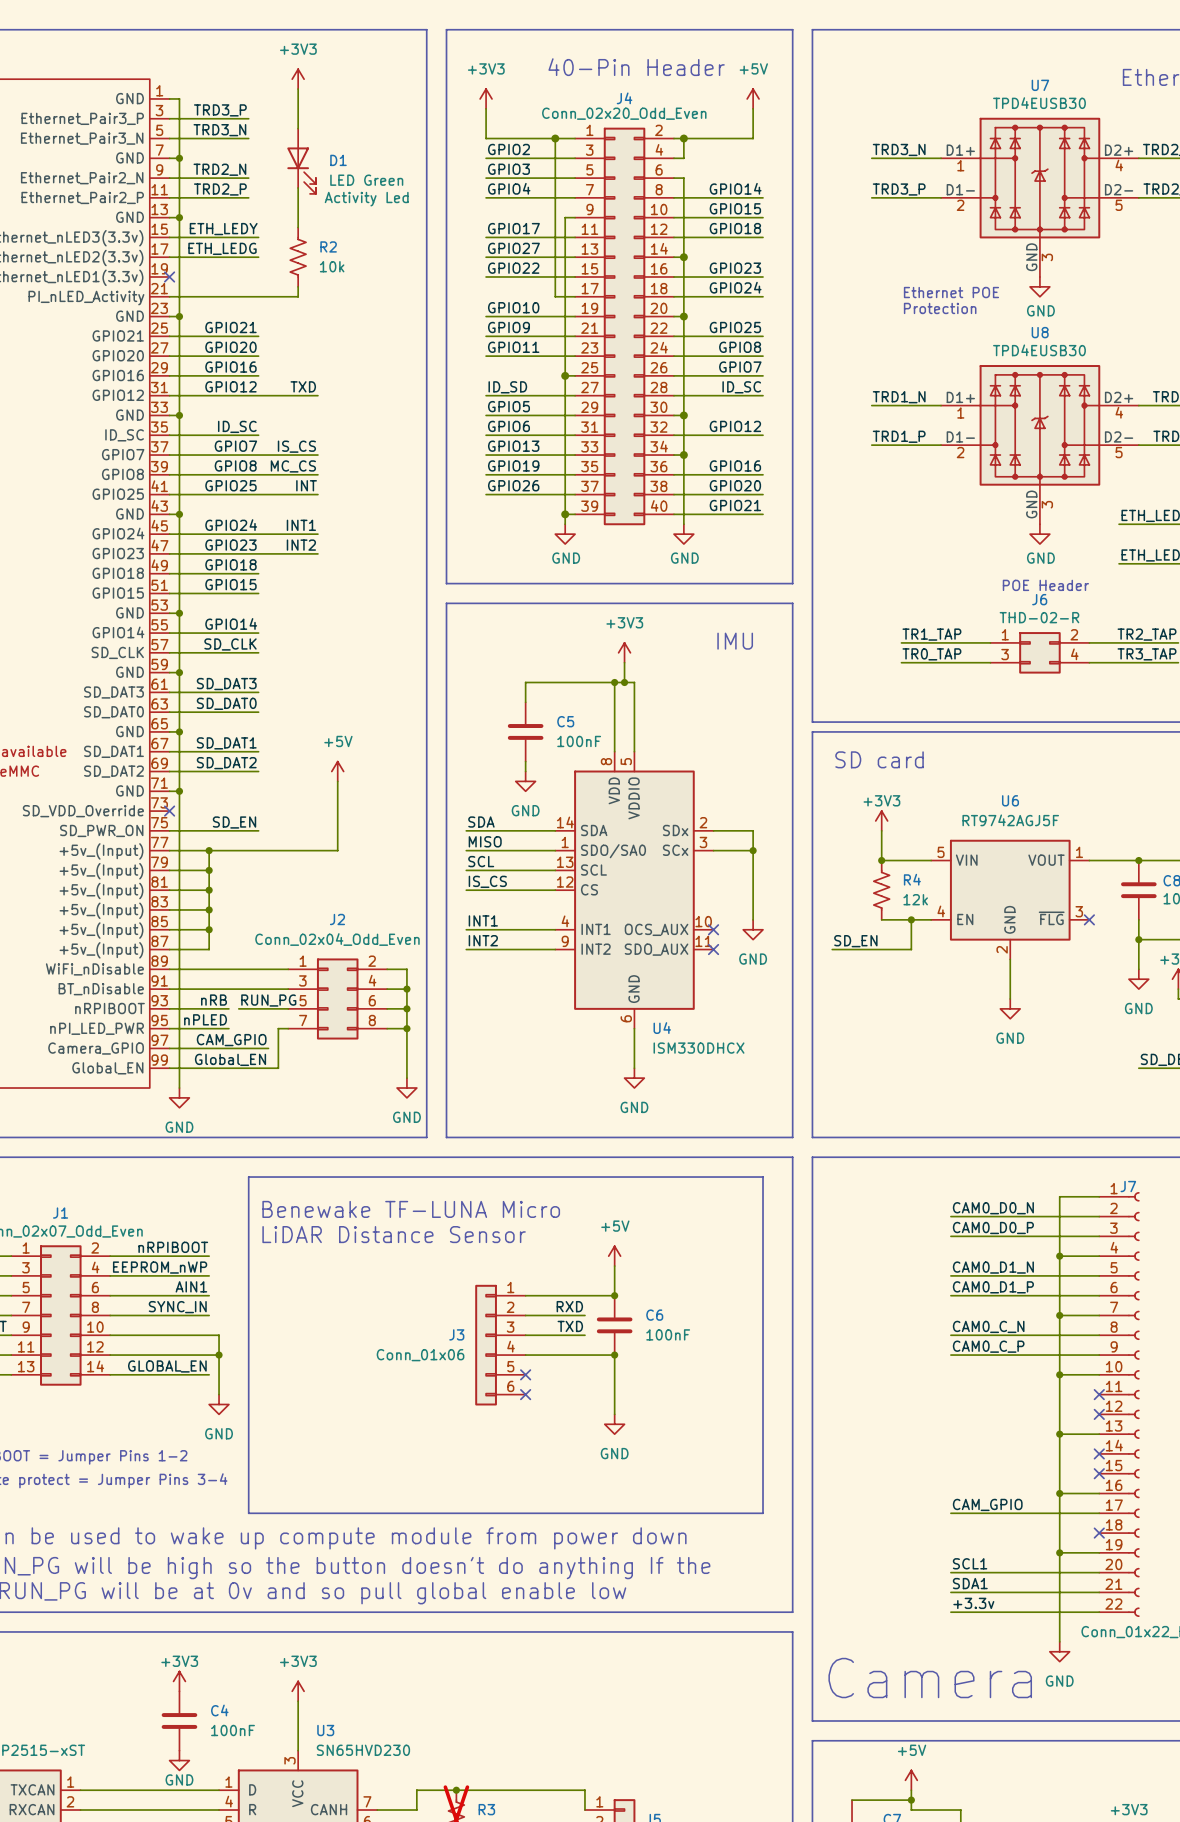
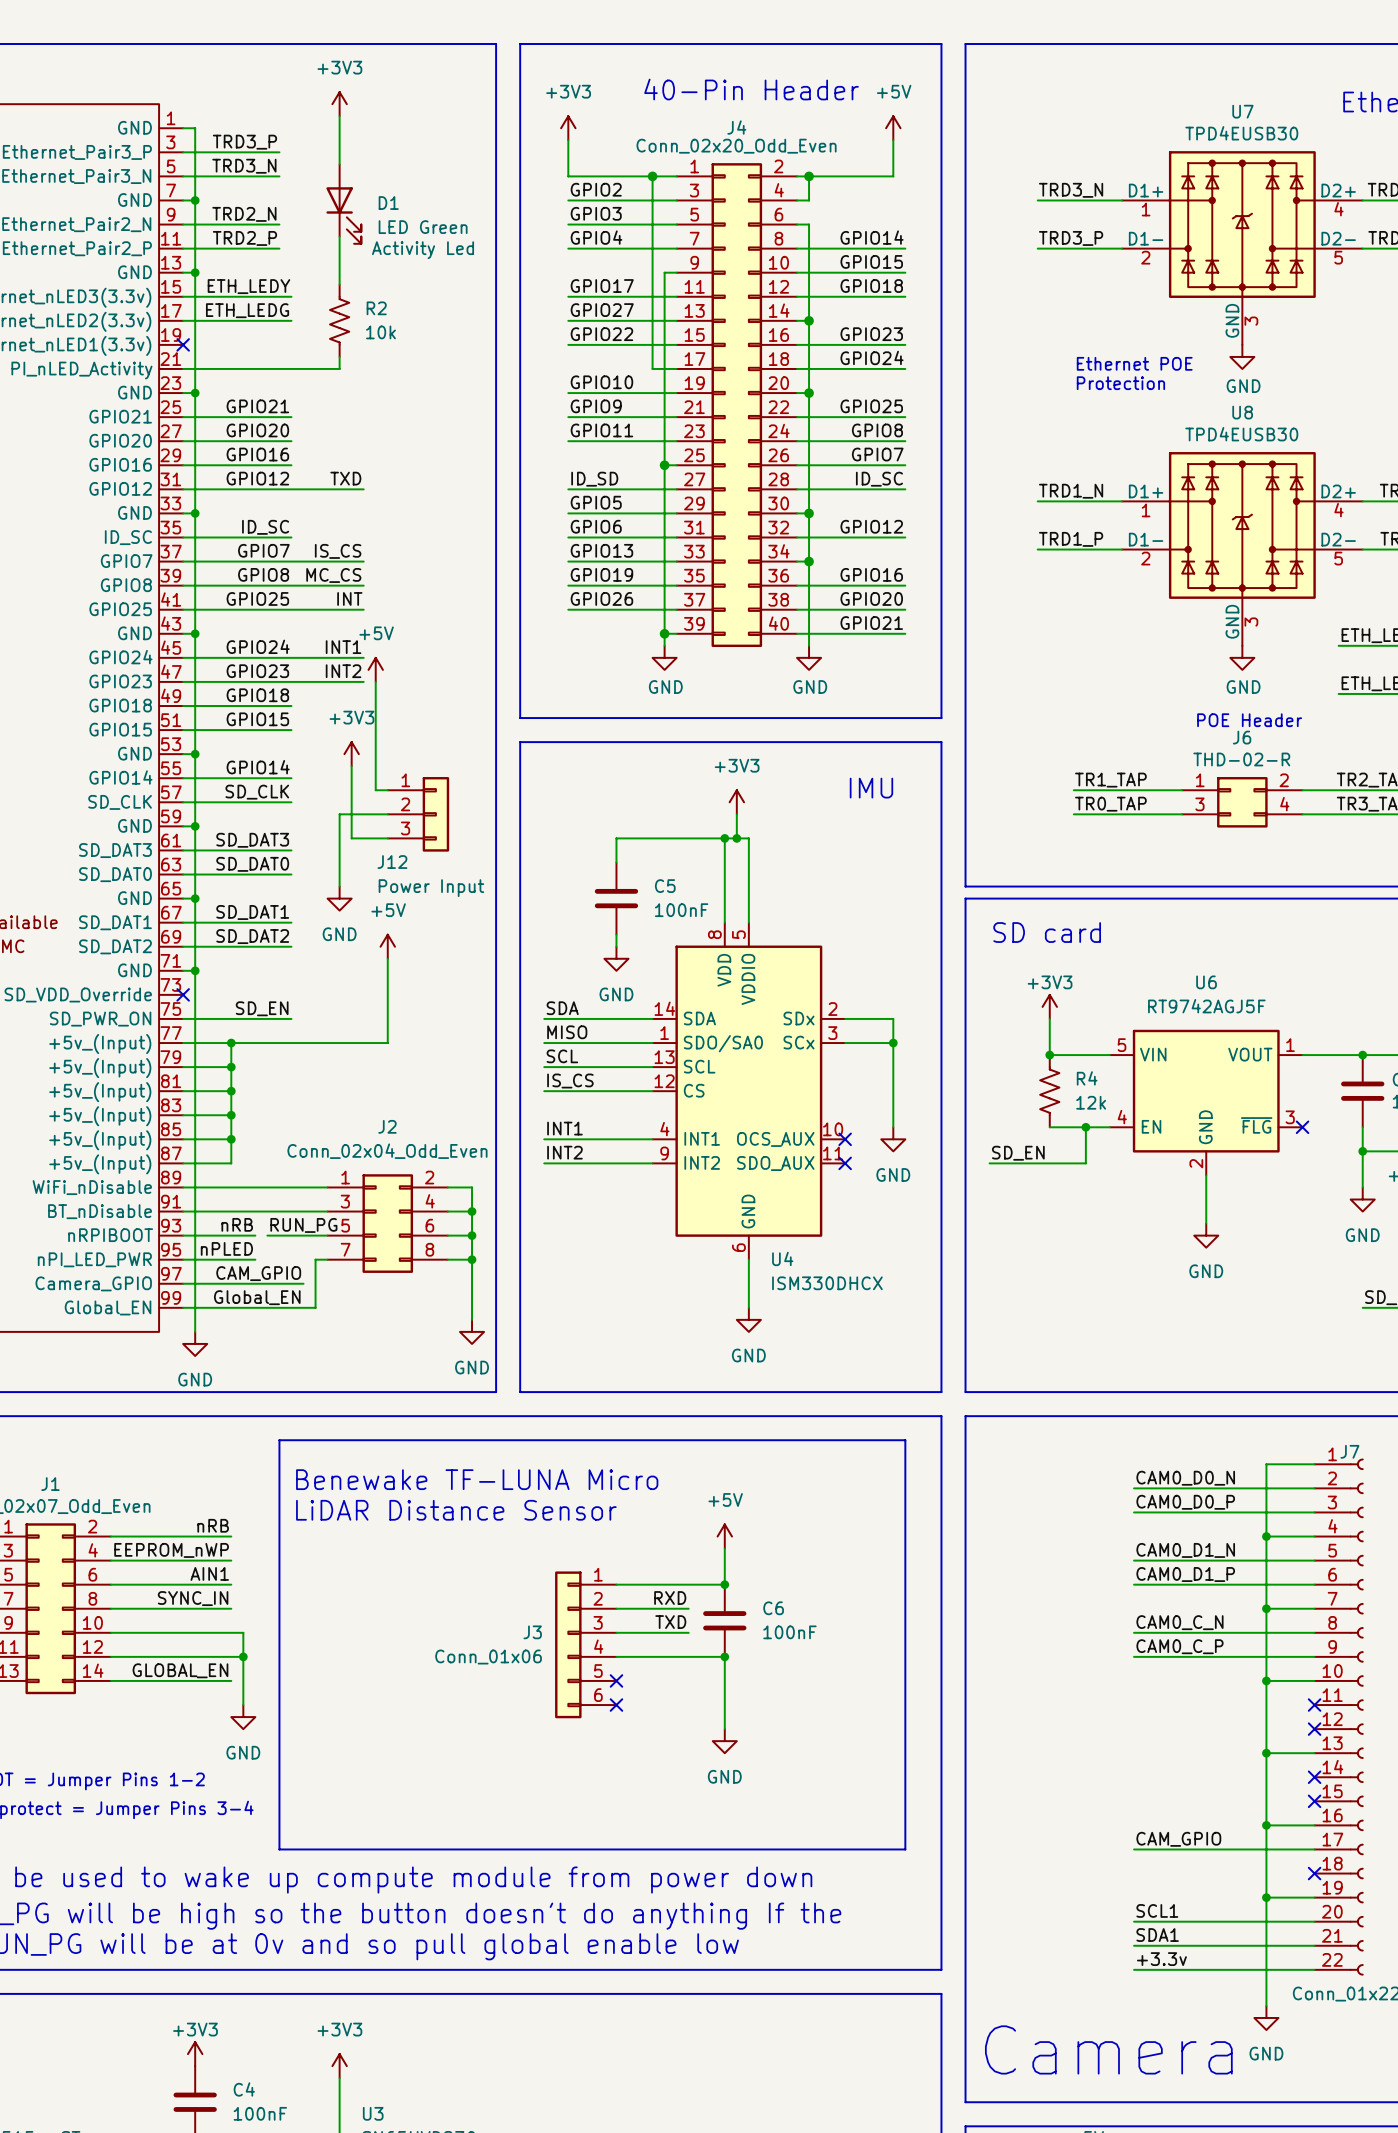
power symbol: none -> +5V (375, 669)
wire: none -> (375, 681) (375, 790) (387, 790)
power symbol: none -> +3V3 (351, 754)
wire: none -> (351, 766) (351, 838) (387, 838)
wire: none -> (387, 814) (339, 814) (339, 886)
J12: none -> Power Input (418, 814)
power symbol: none -> GND (339, 898)
label: nRPIBOOT (173, 1247) -> nRB (213, 1525)

